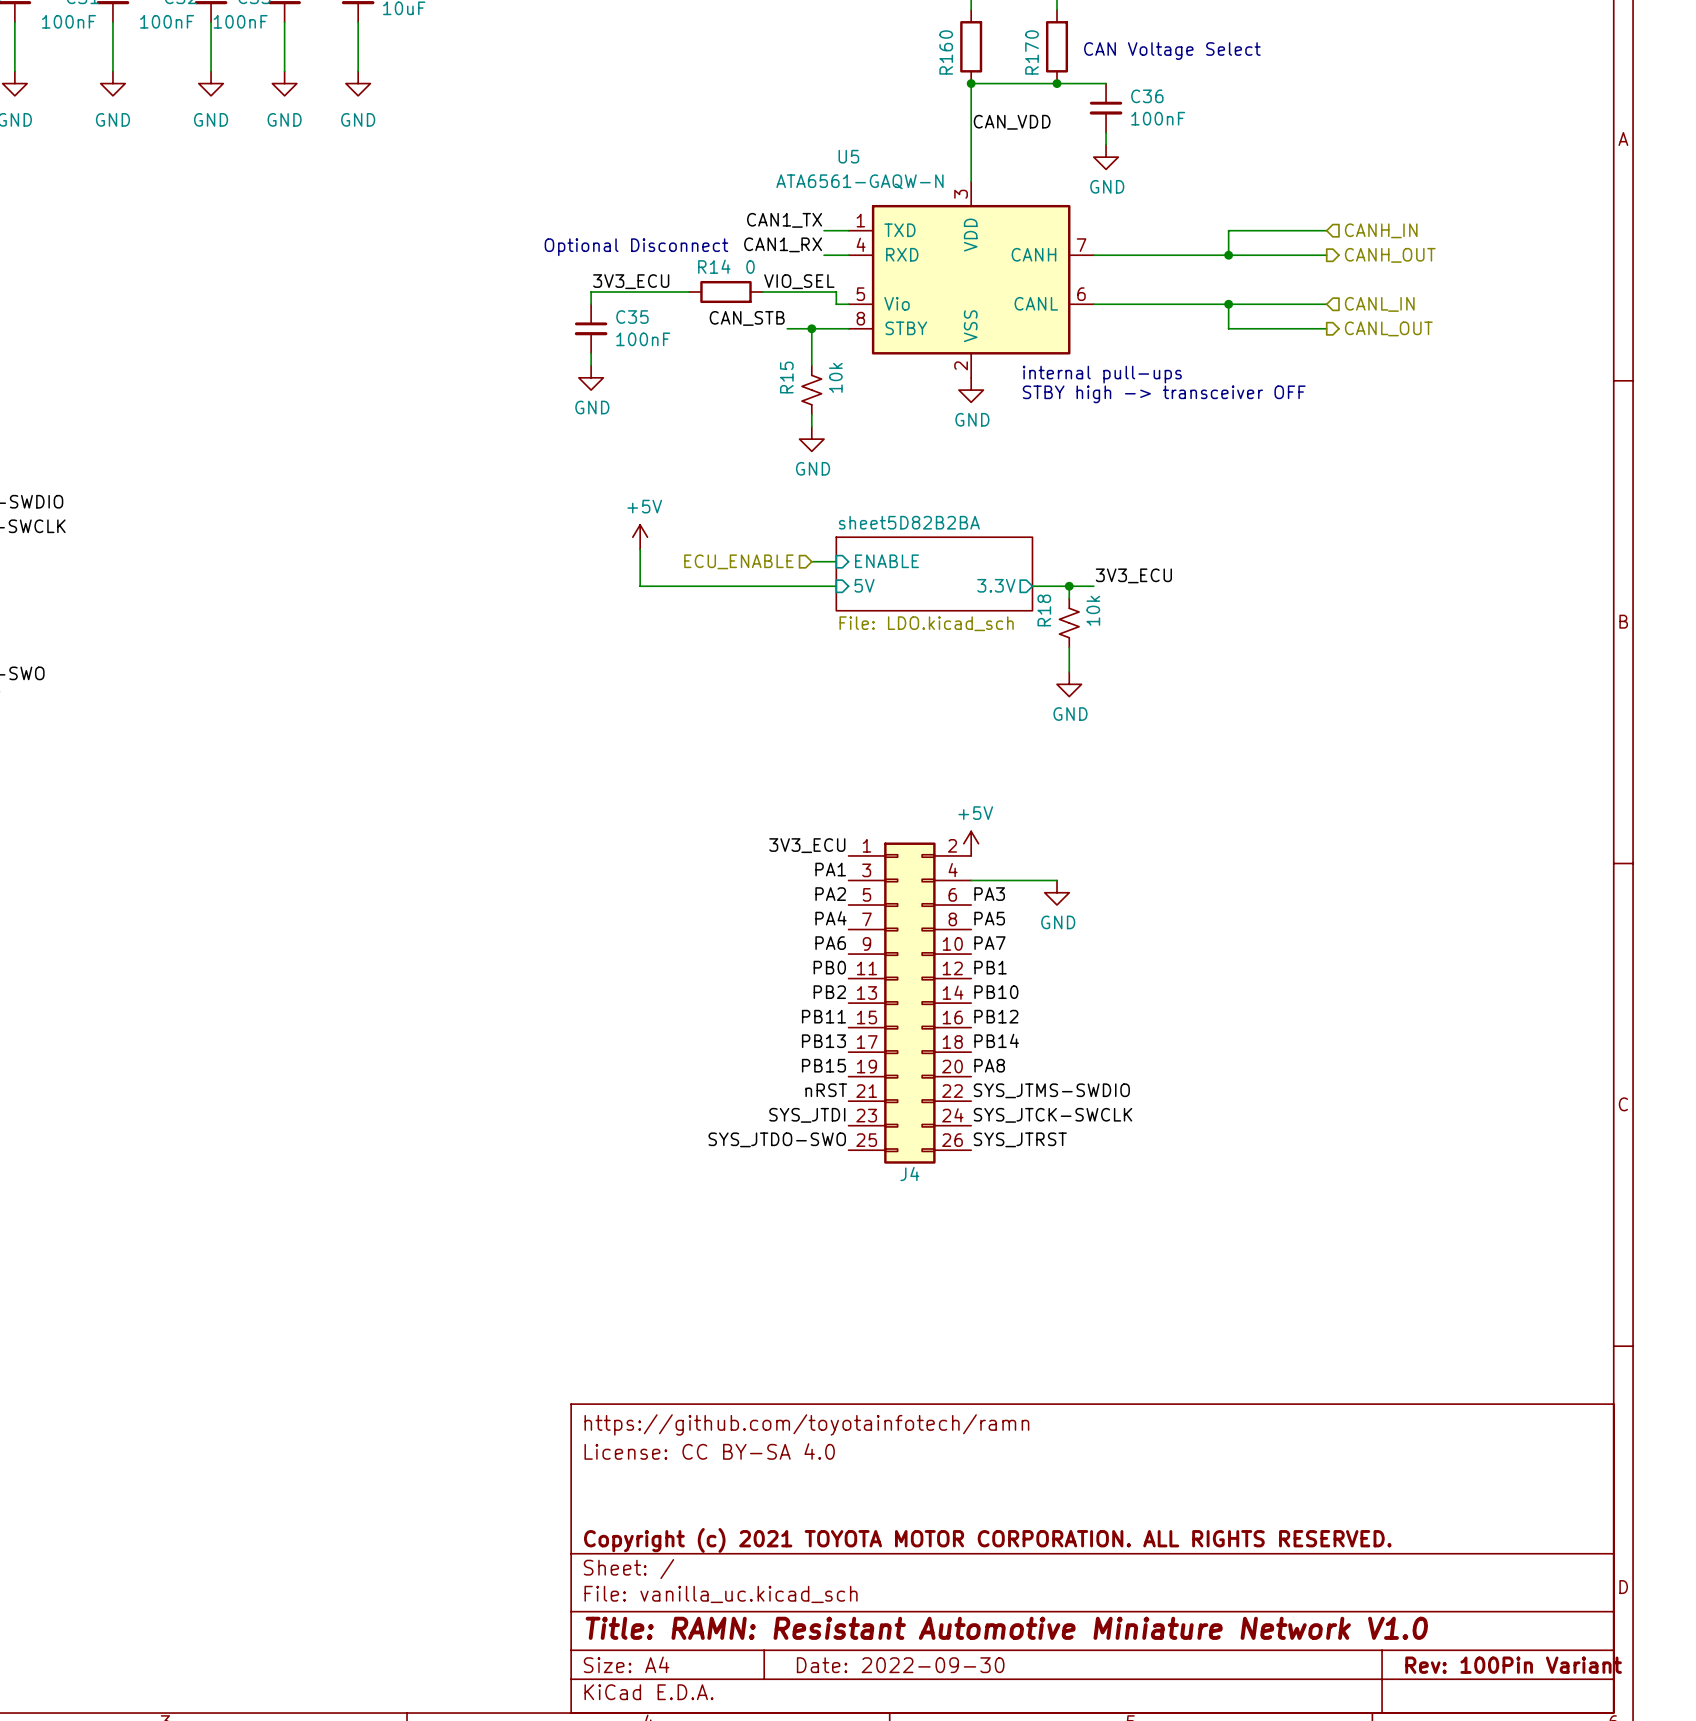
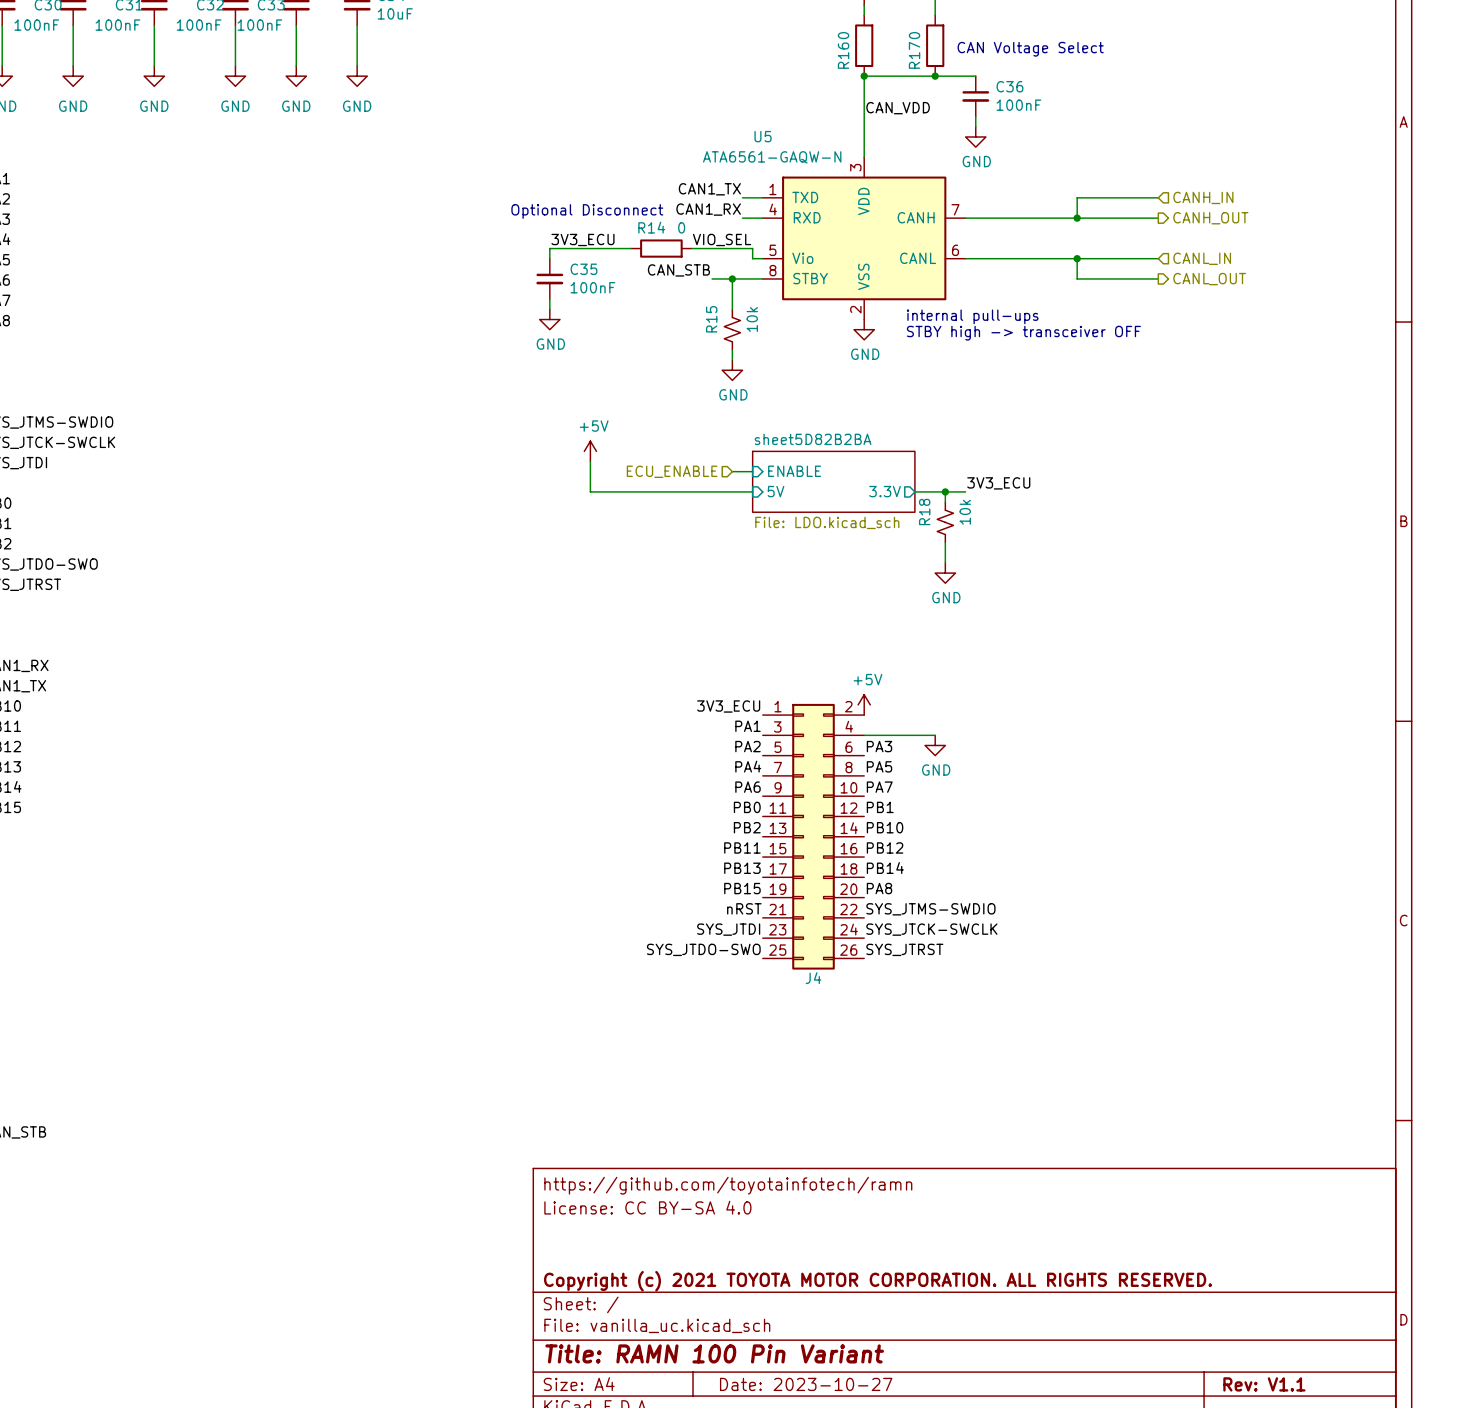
title block: Title: RAMN: Resistant Automotive Miniature Network V1.0 (1006, 1628) -> Title: RAMN 100 Pin Variant (714, 1353)
title block: Date: 2022-09-30 (900, 1665) -> Date: 2023-10-27 (806, 1384)
title block: Rev: 100Pin Variant (1513, 1665) -> Rev: V1.1 (1264, 1384)

